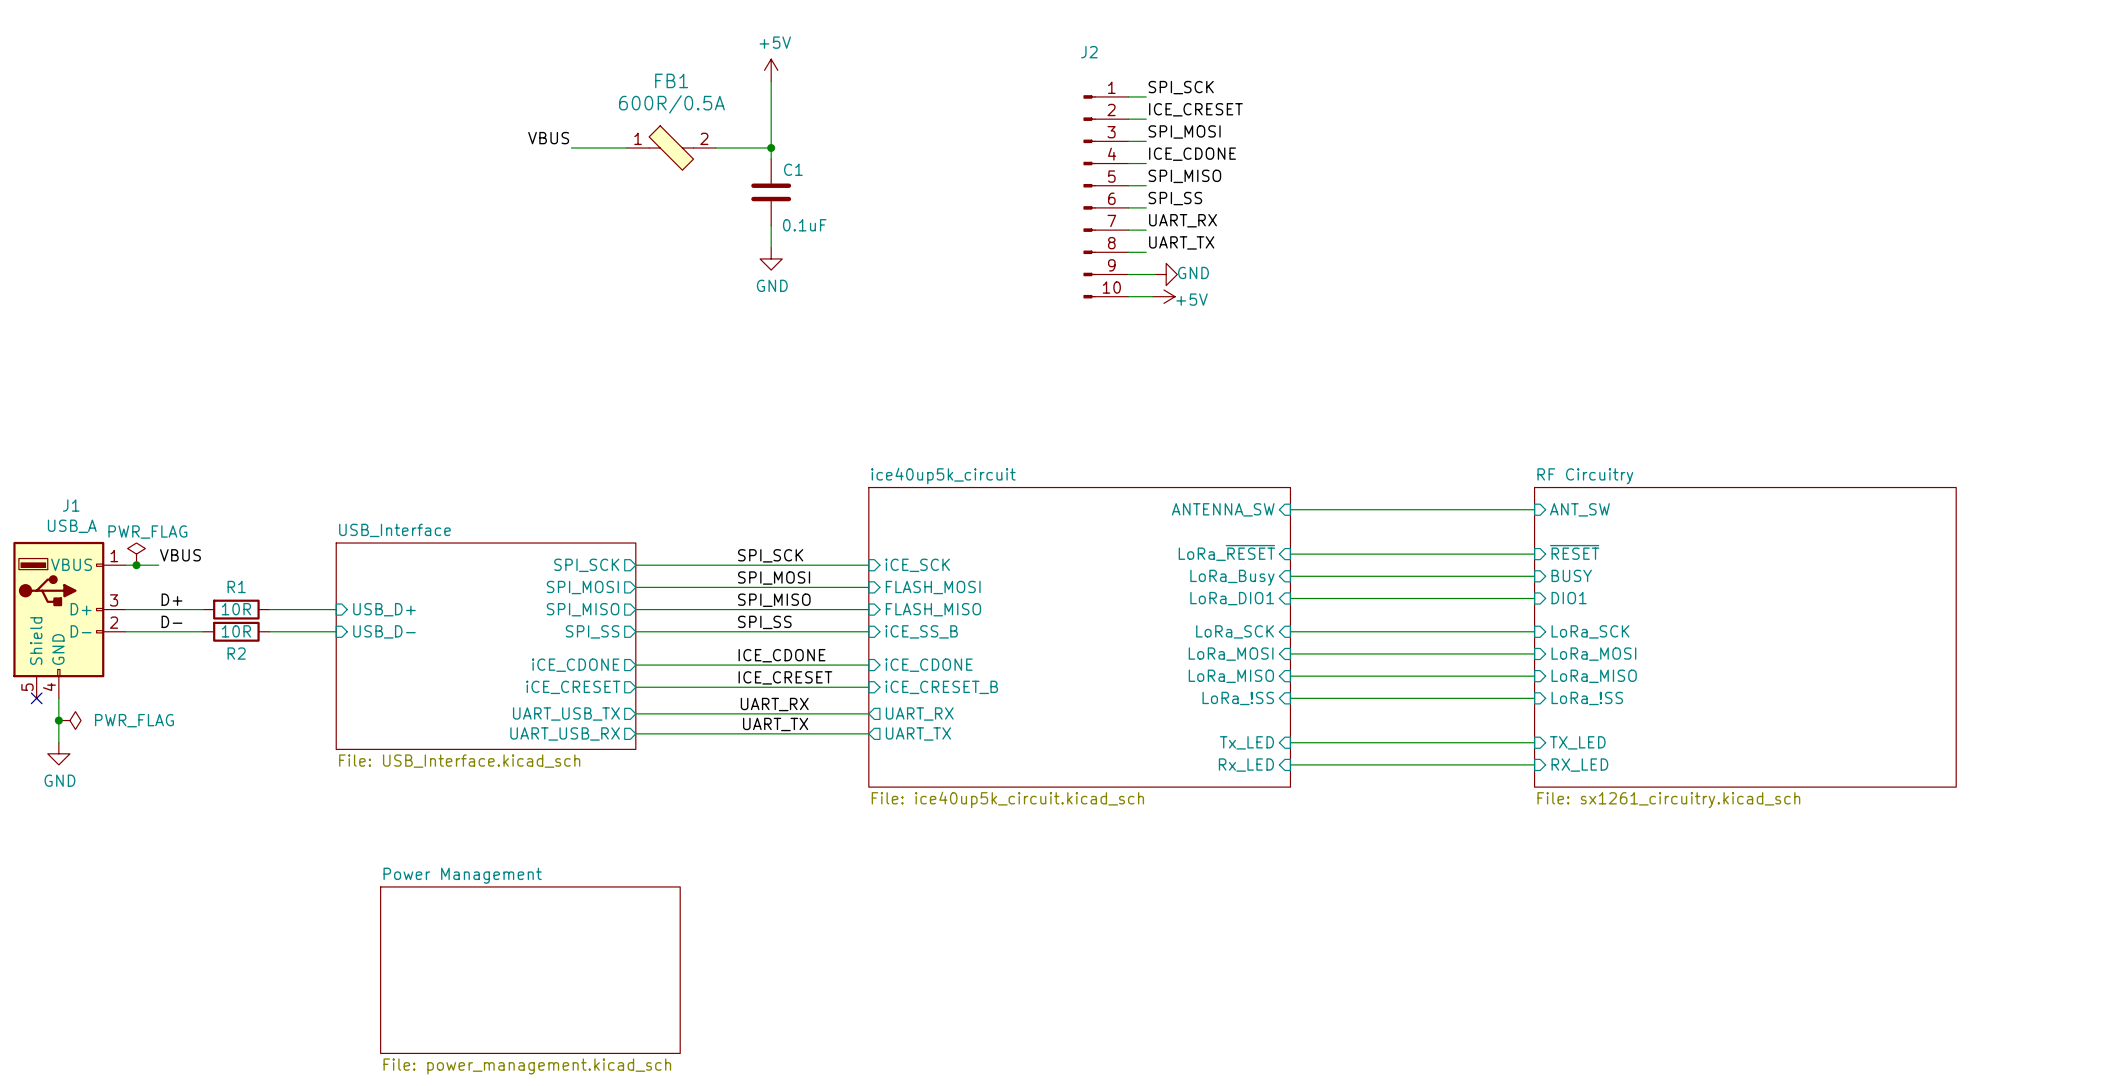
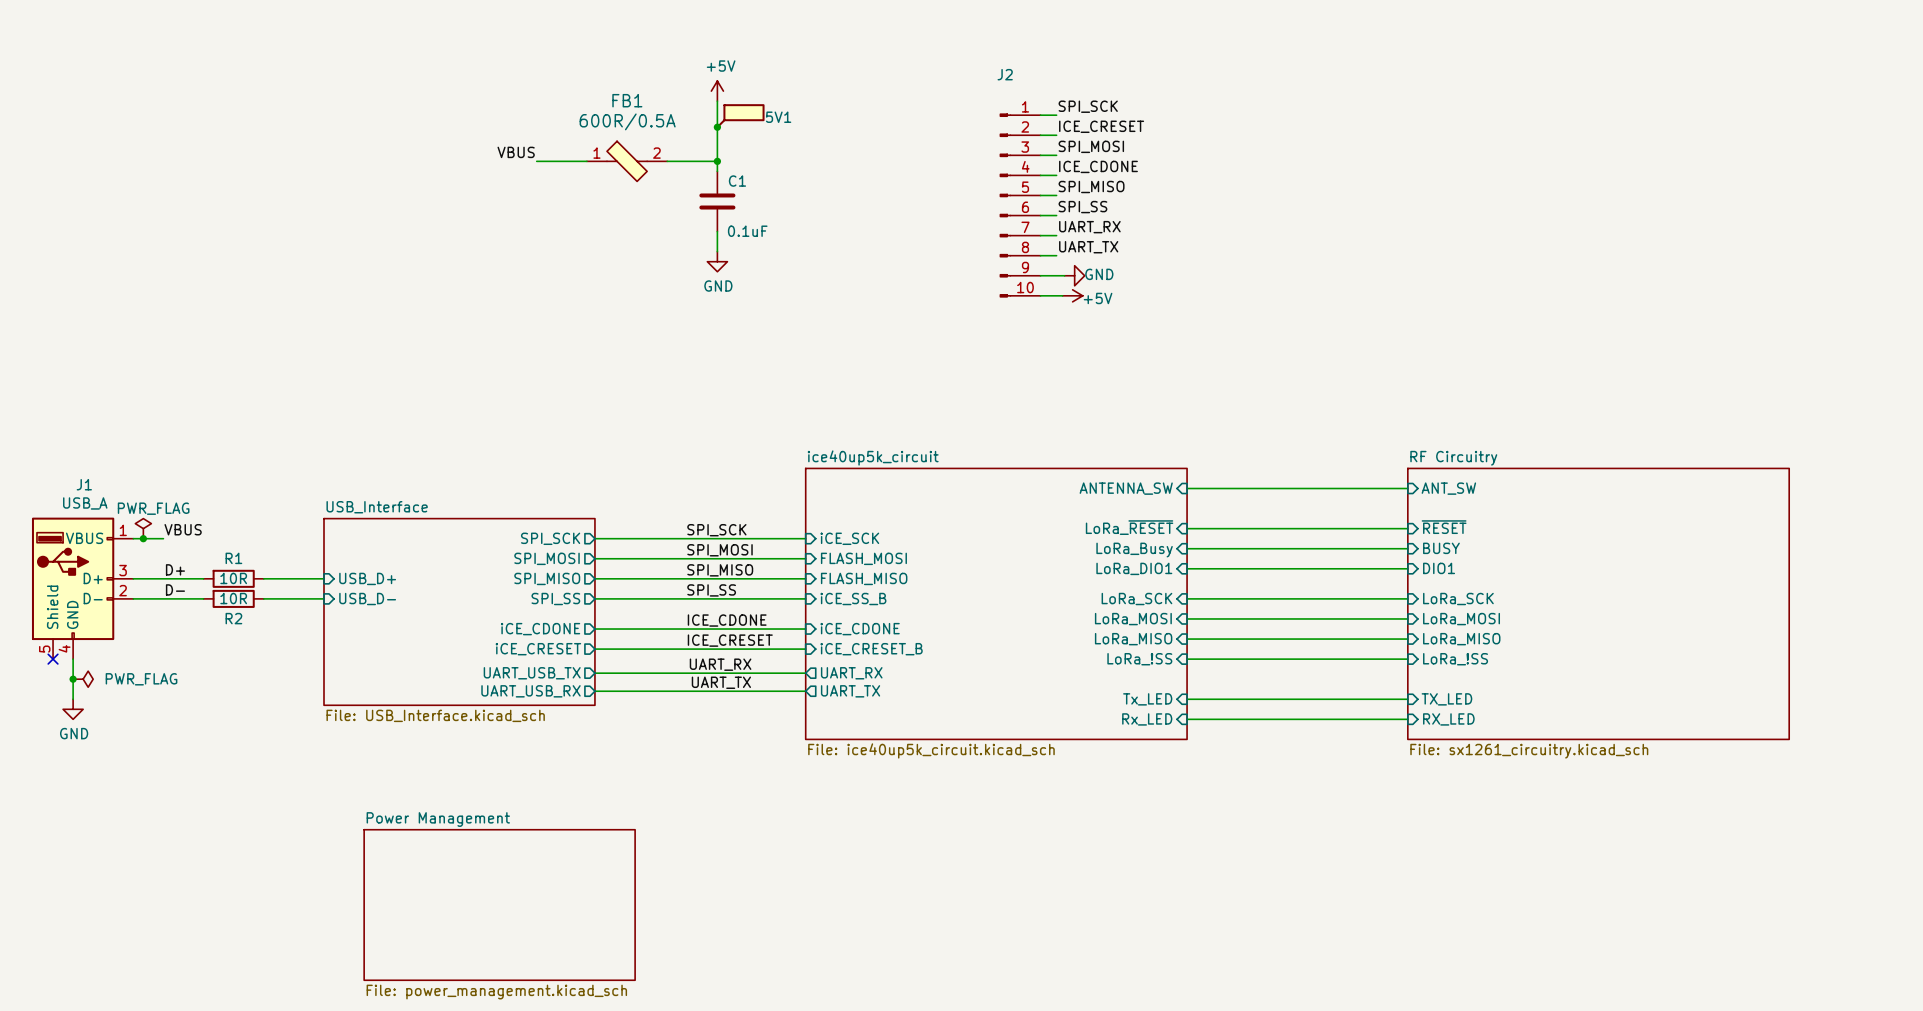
5V1: none -> (740, 116)
junction: none -> (717, 127)

